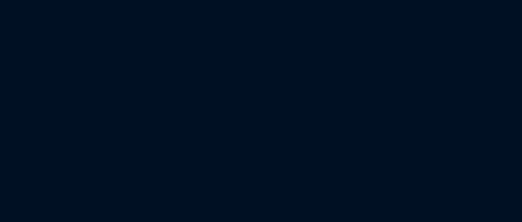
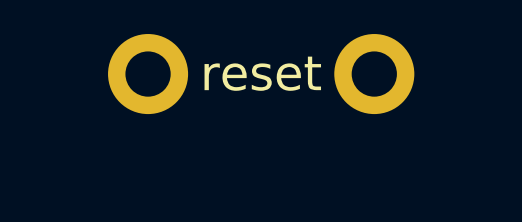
part: none -> (261, 74)

